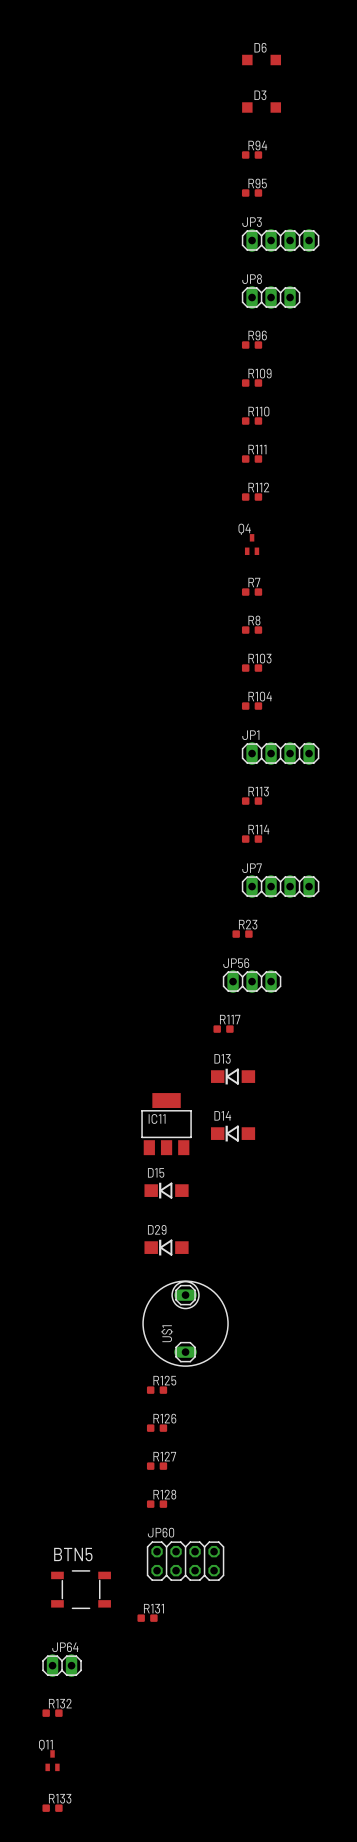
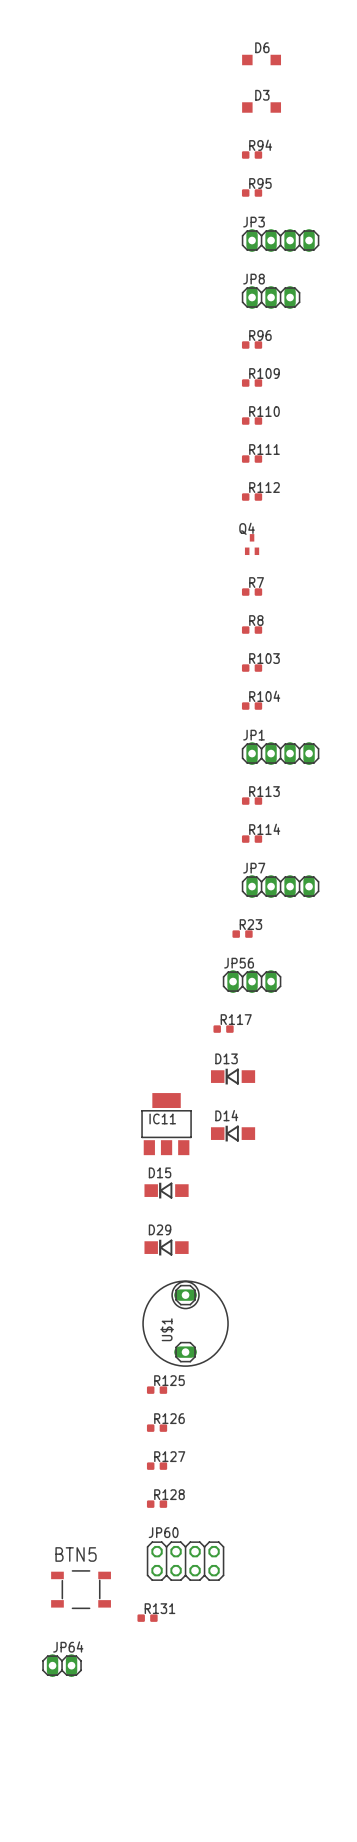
R132: (52, 1713) -> none
Q11: (52, 1760) -> none
R133: (52, 1808) -> none

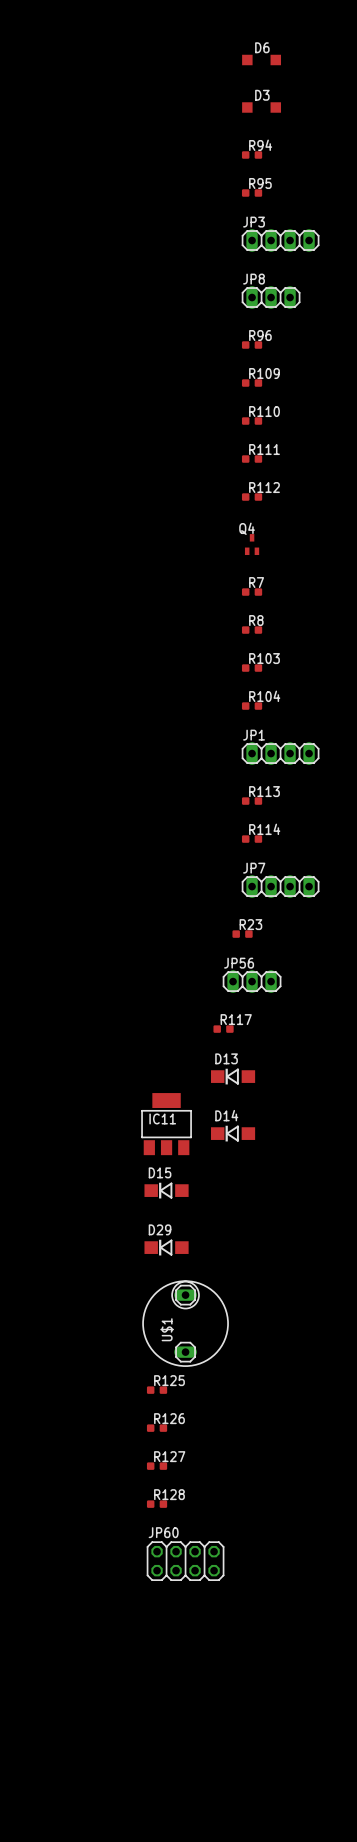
BTN5: (81, 1589) -> none
R131: (147, 1618) -> none
JP64: (62, 1665) -> none

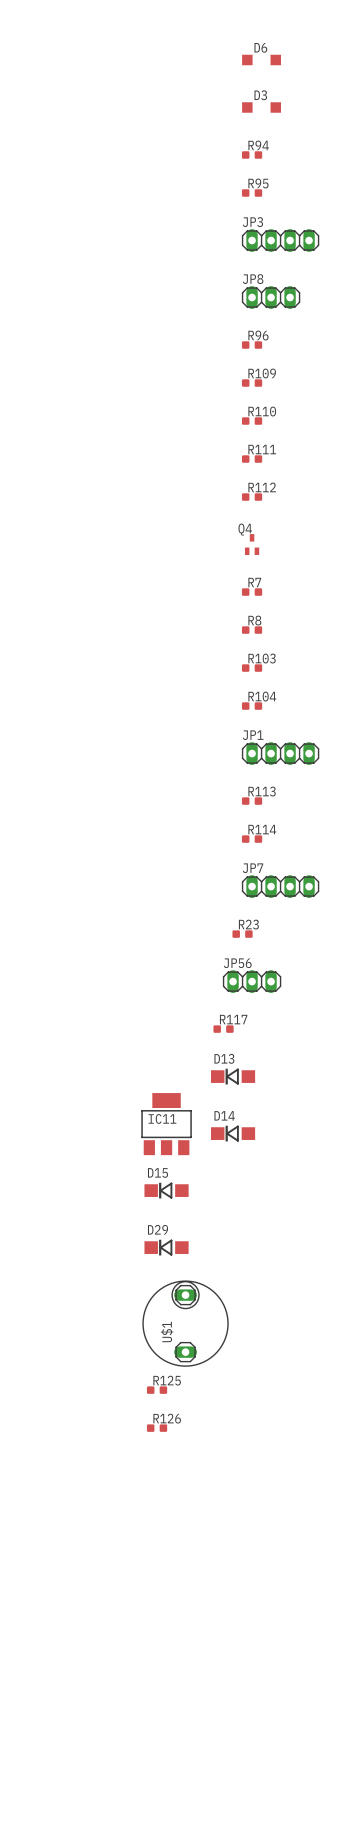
R127: (157, 1466) -> none
R128: (157, 1504) -> none
JP60: (185, 1561) -> none

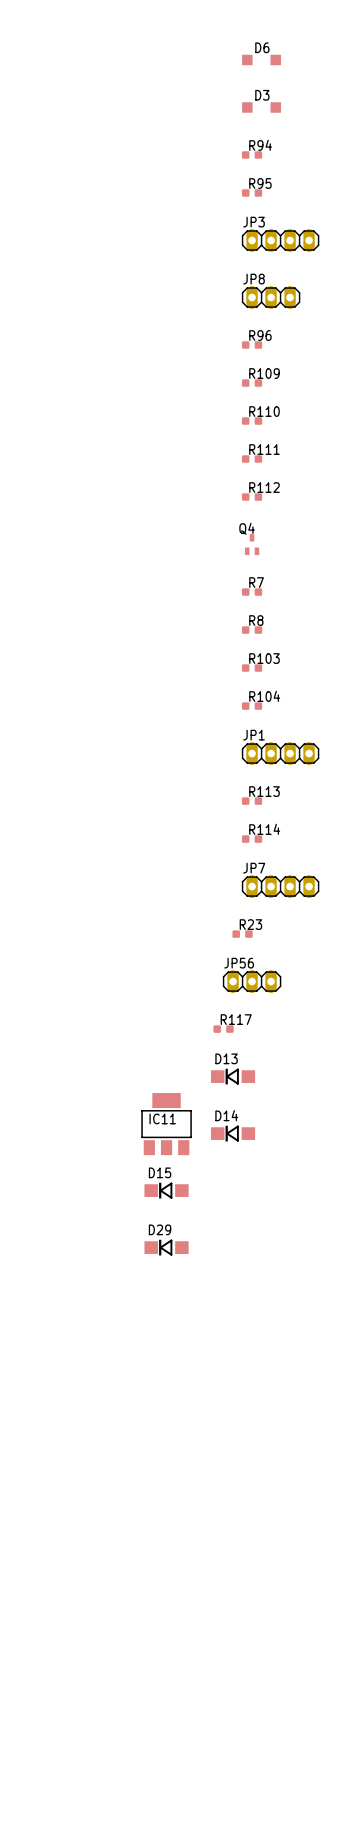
U$1: (185, 1323) -> none
R125: (157, 1390) -> none
R126: (157, 1428) -> none

